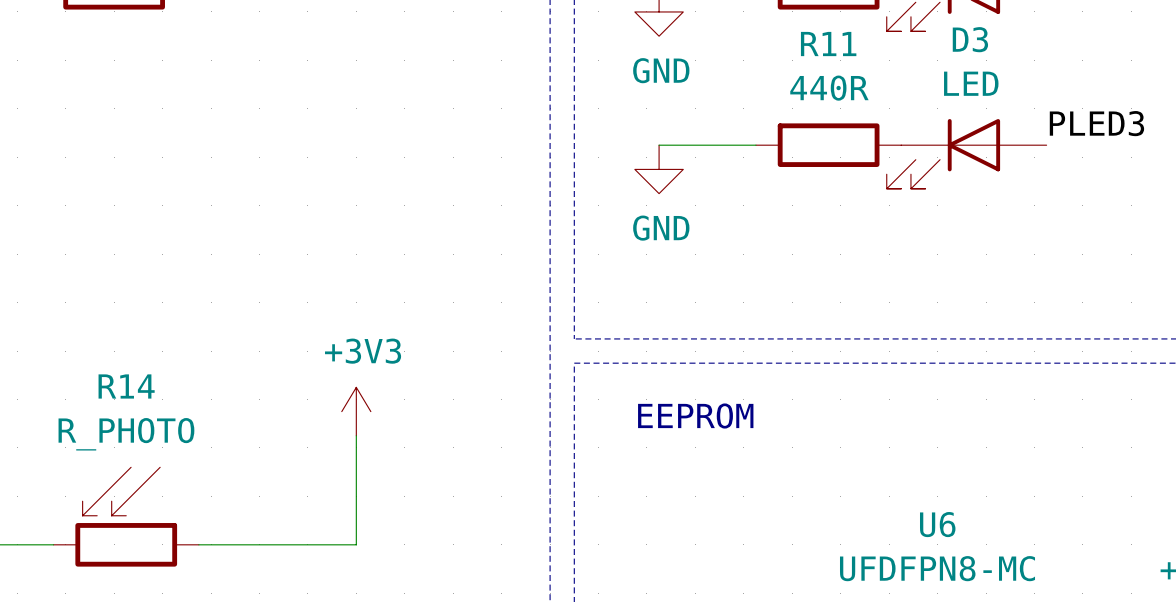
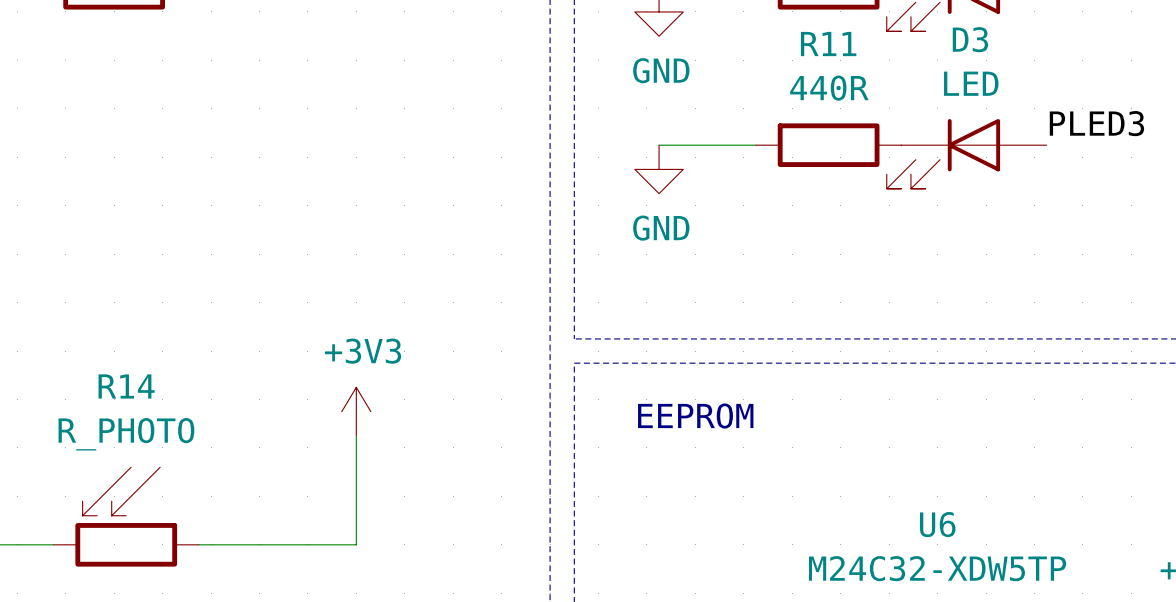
U6 value: UFDFPN8-MC (937, 568) -> M24C32-XDW5TP (937, 568)

